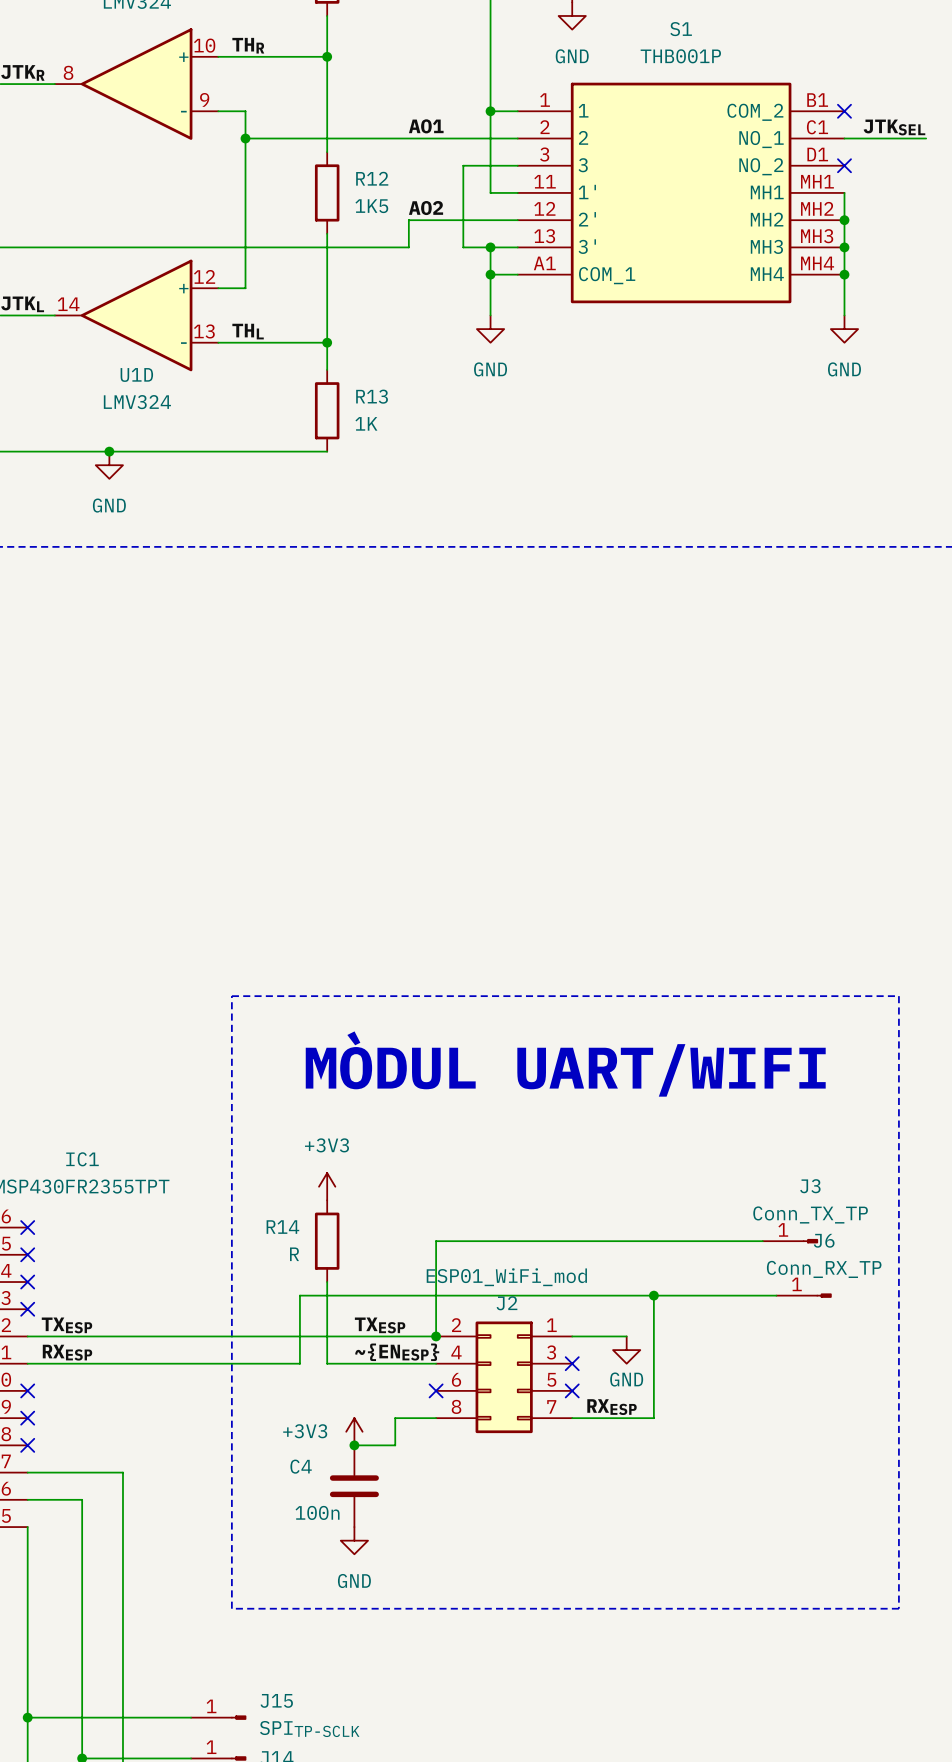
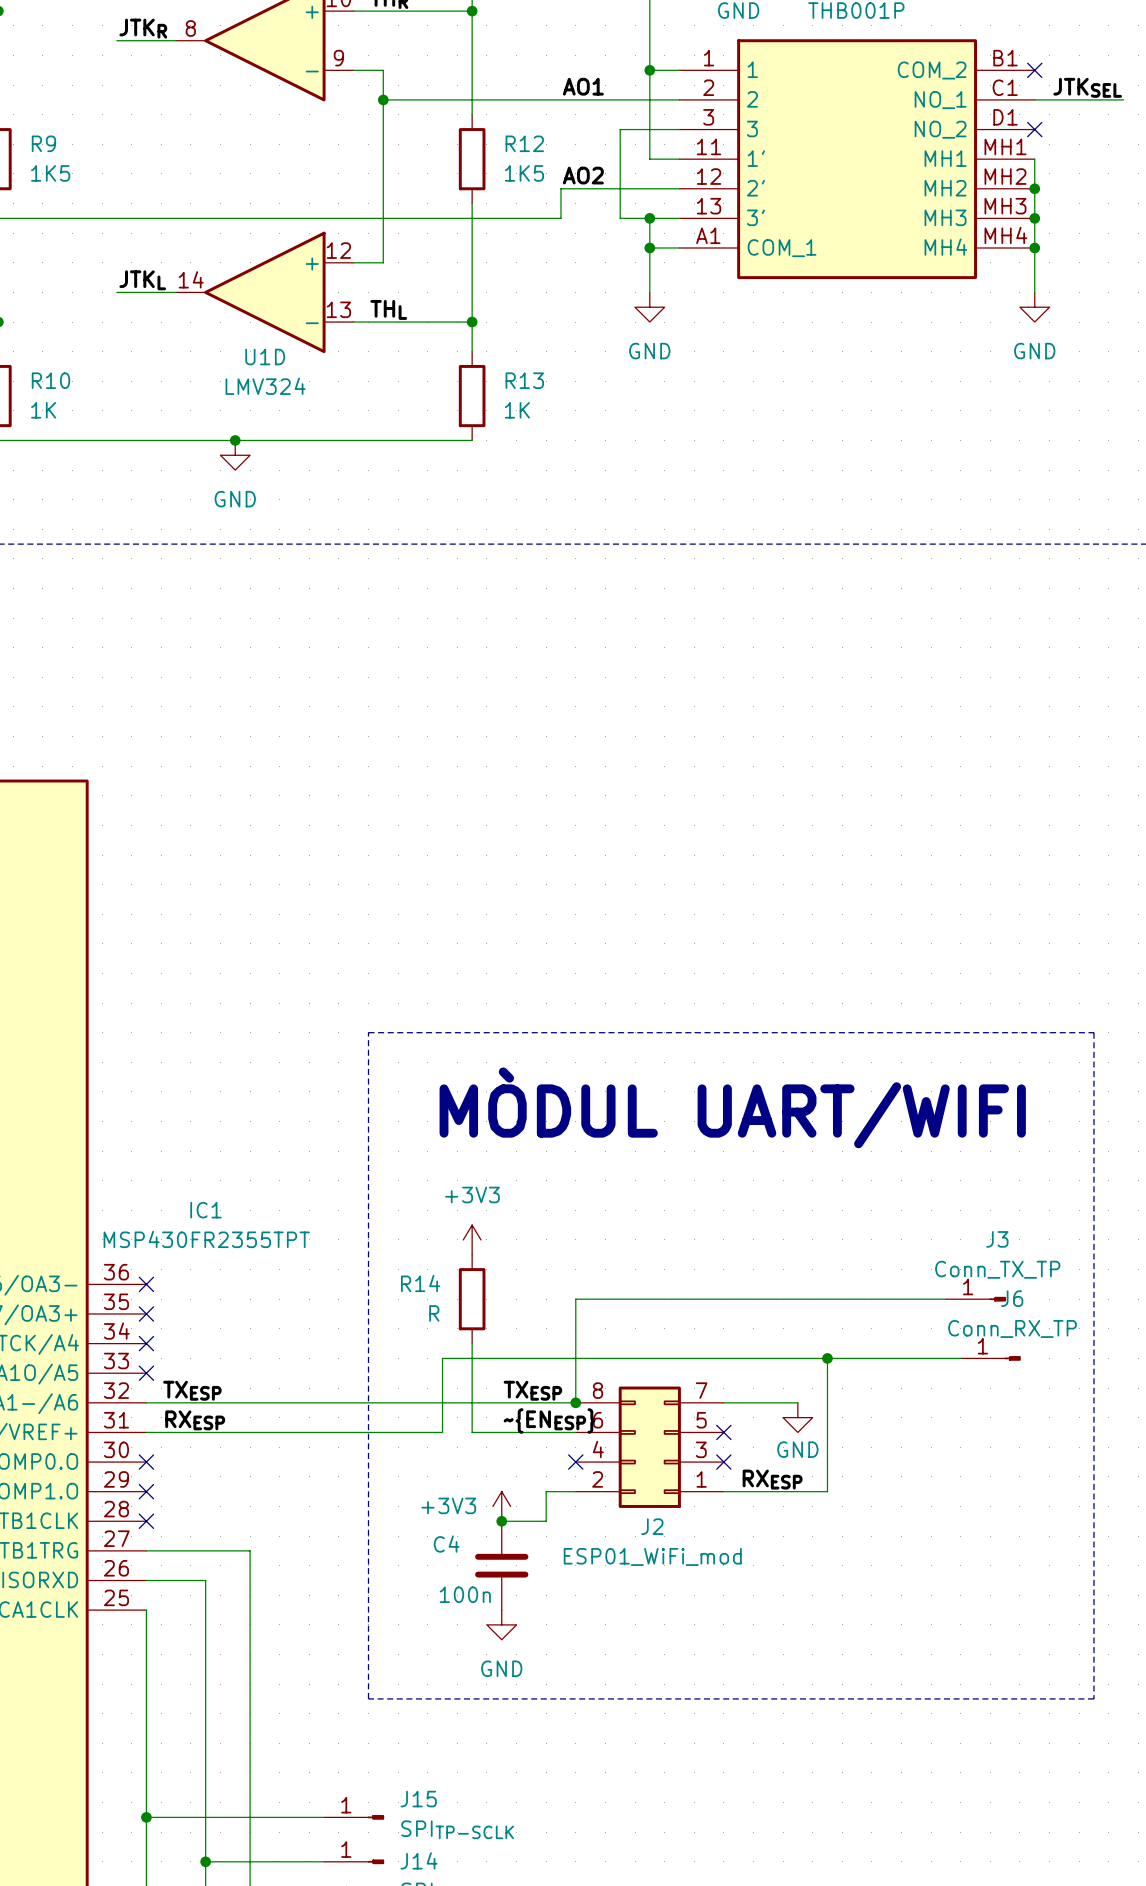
wire: (436, 1241) (436, 1336) (422, 1336) -> (590, 1299) (575, 1299) (575, 1402)
junction position: (436, 1336) -> (575, 1402)
no-connect mark position: (572, 1363) -> (723, 1432)
J2 flip: as is (504, 1377) -> up-down (649, 1447)
no-connect mark position: (436, 1390) -> (575, 1462)
no-connect mark position: (572, 1390) -> (723, 1462)
label position: RXESP (612, 1407) -> RXESP (772, 1479)

